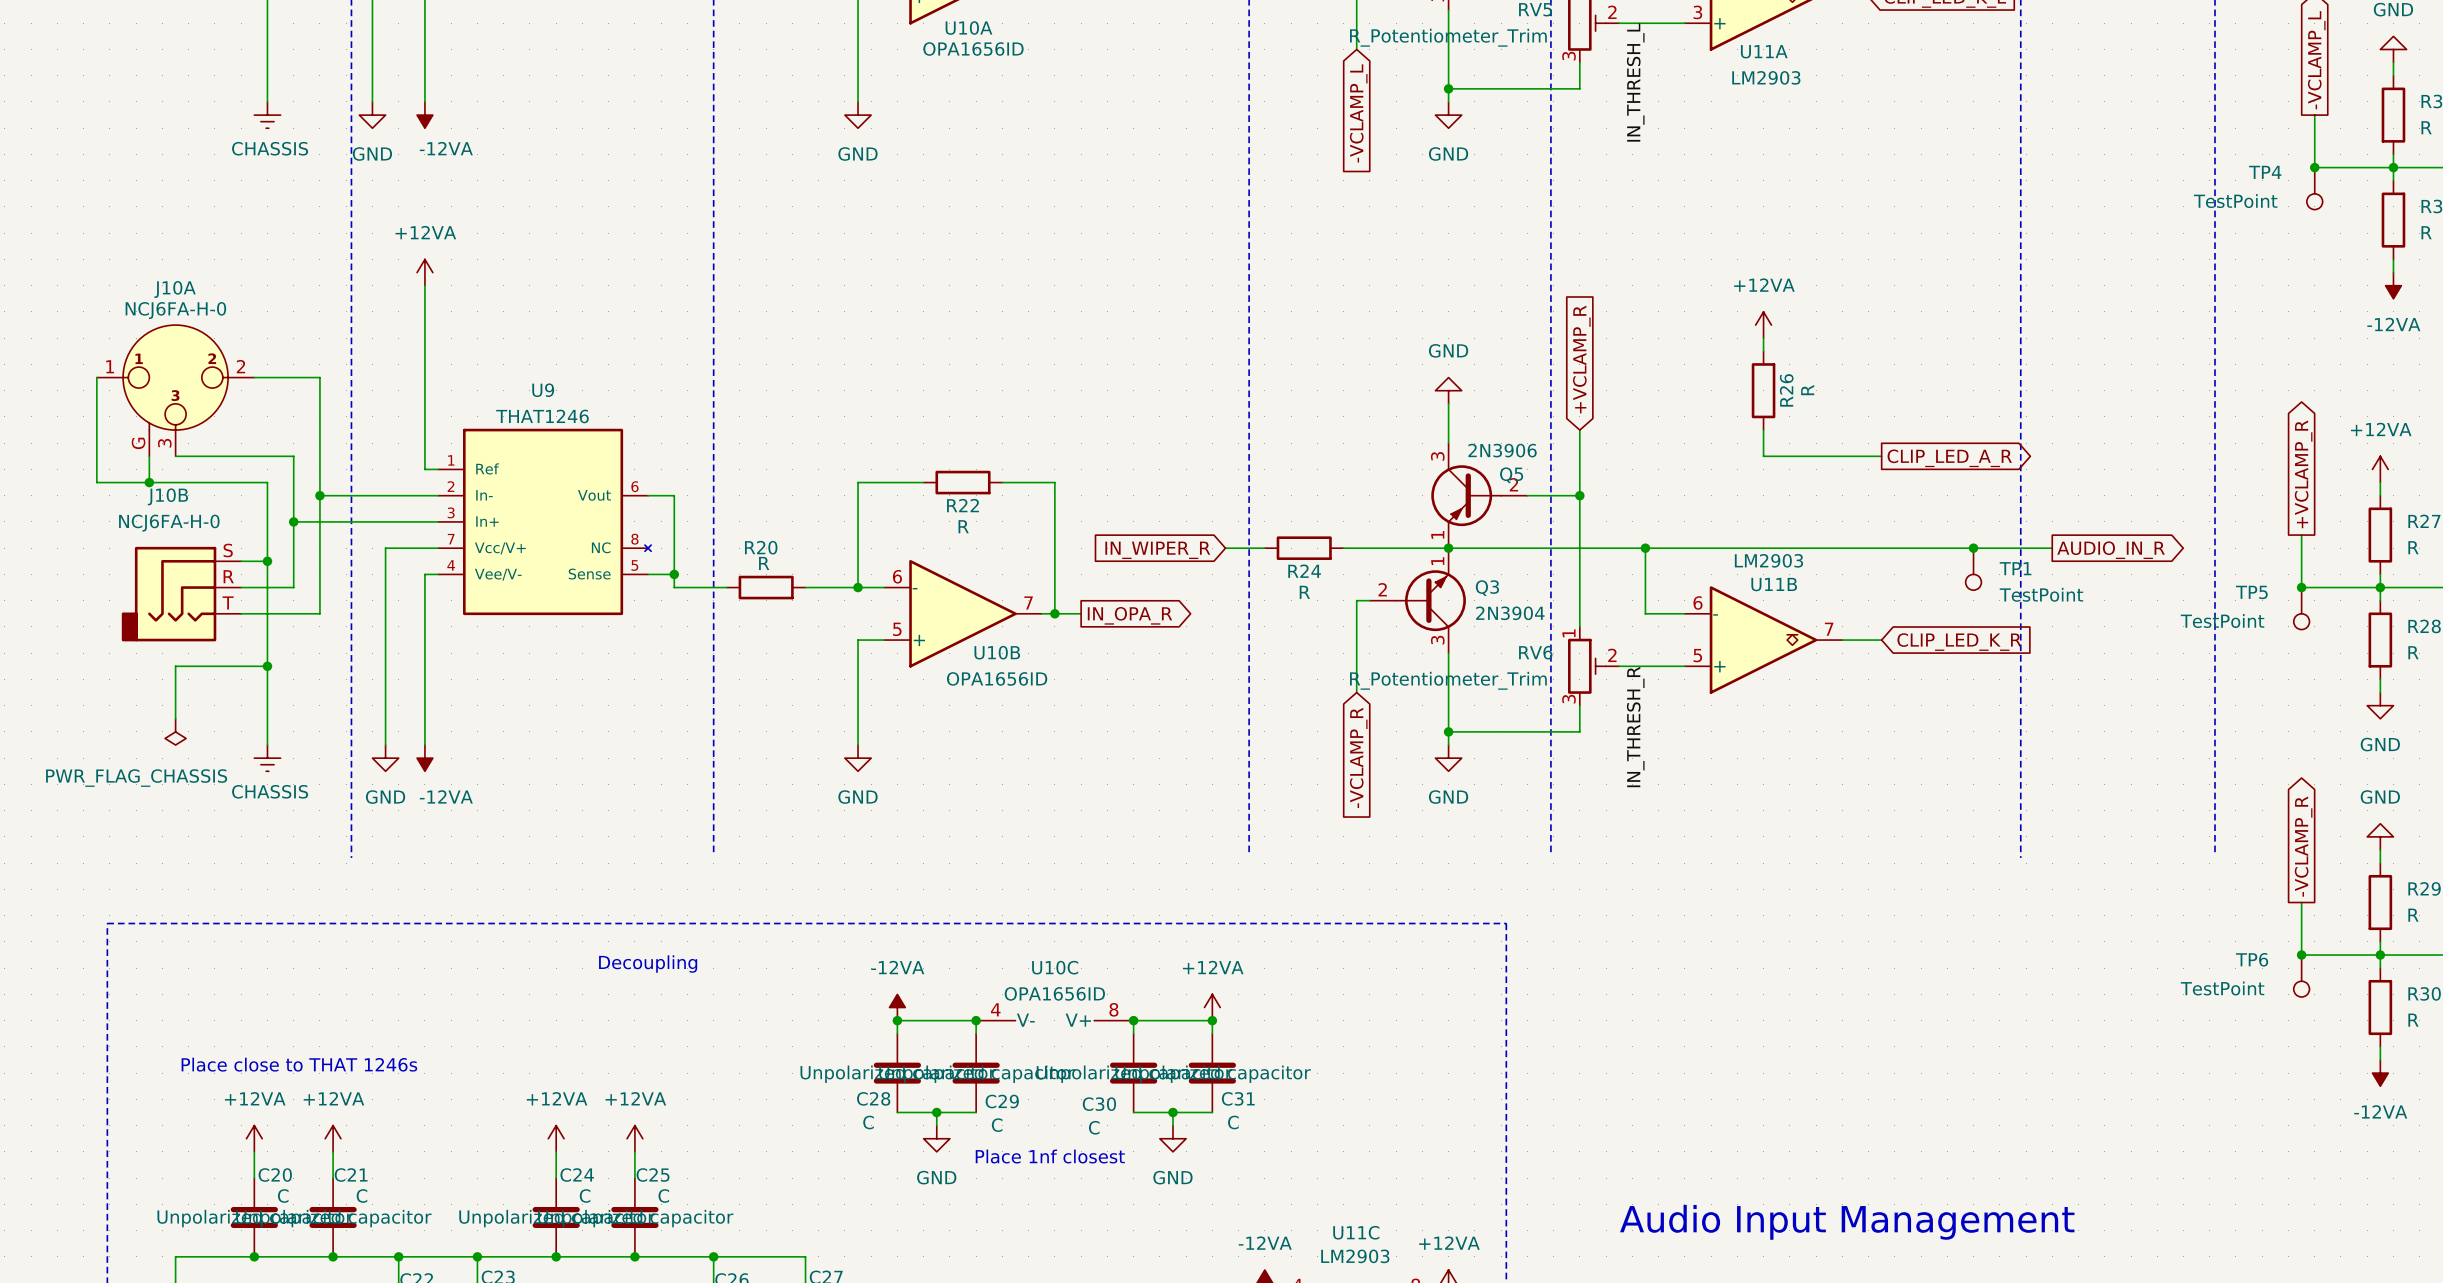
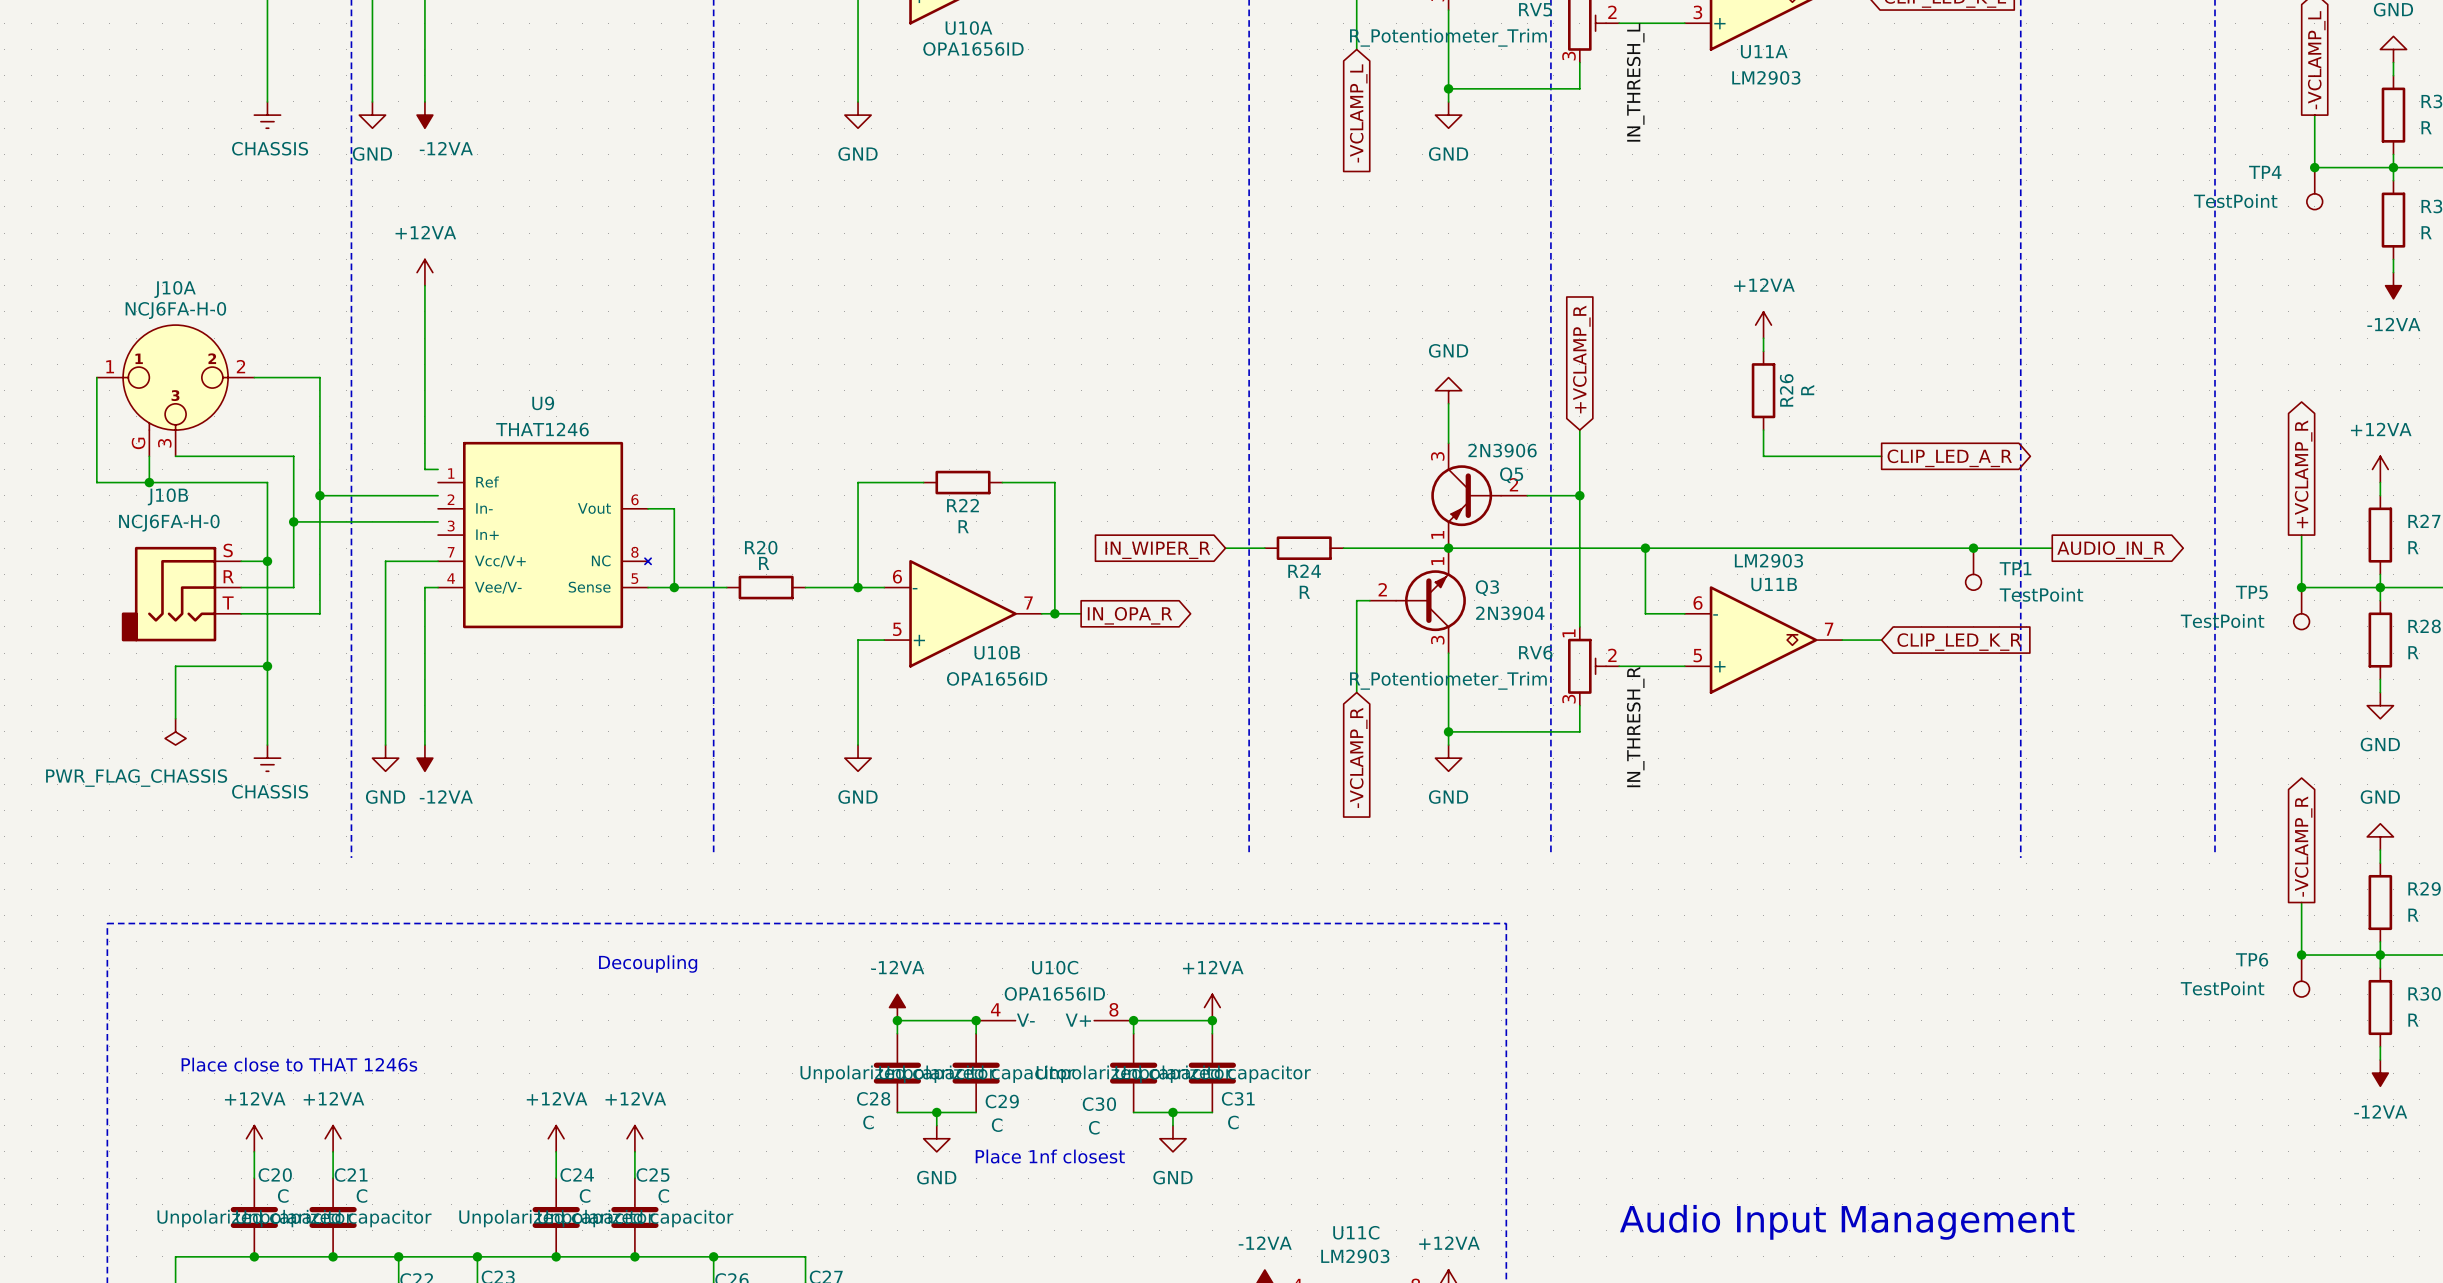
wire: (648, 495) (674, 495) (674, 508) -> (648, 508) (674, 508)
U9 position: (544, 521) -> (544, 535)
wire: (438, 548) (385, 548) (385, 561) -> (438, 561) (385, 561)
wire: (438, 574) (424, 574) (424, 587) -> (438, 587) (424, 587)
wire: (648, 574) (674, 574) -> (648, 587) (674, 587)
junction position: (674, 574) -> (674, 587)

